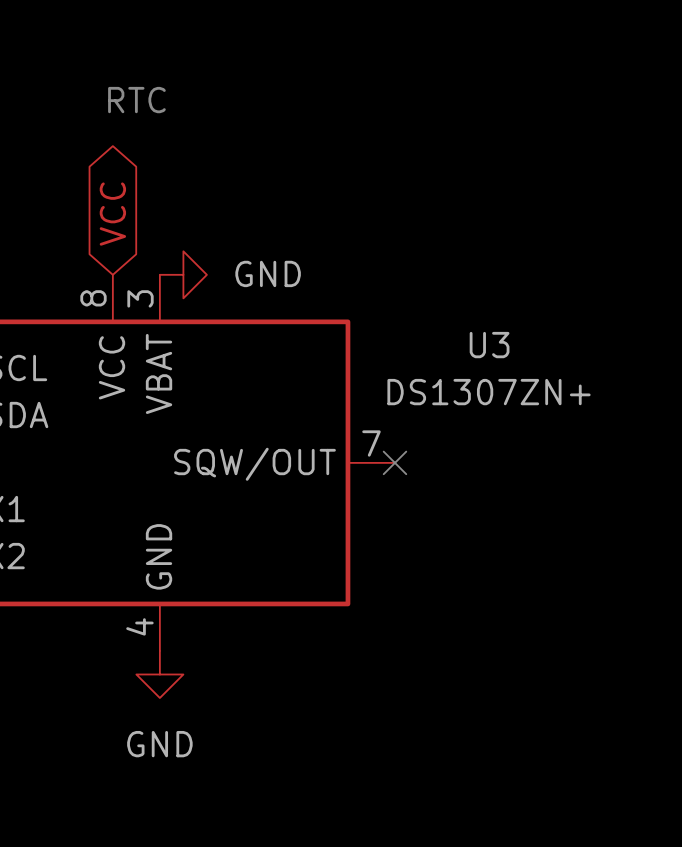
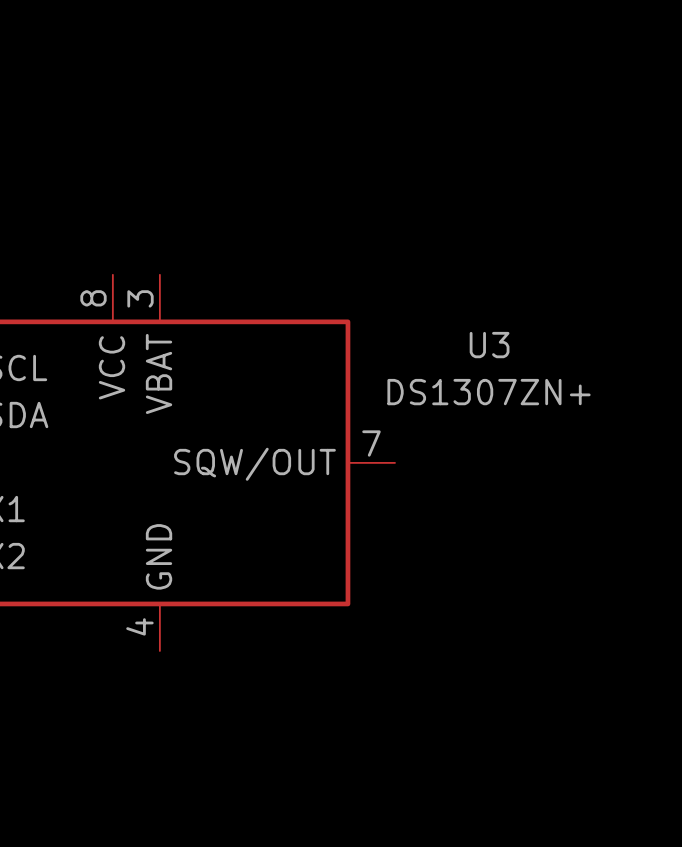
text: RTC (136, 100) -> none
global label: VCC (112, 214) -> none
power symbol: GND (183, 274) -> none
no-connect mark: (394, 462) -> none
power symbol: GND (159, 674) -> none

